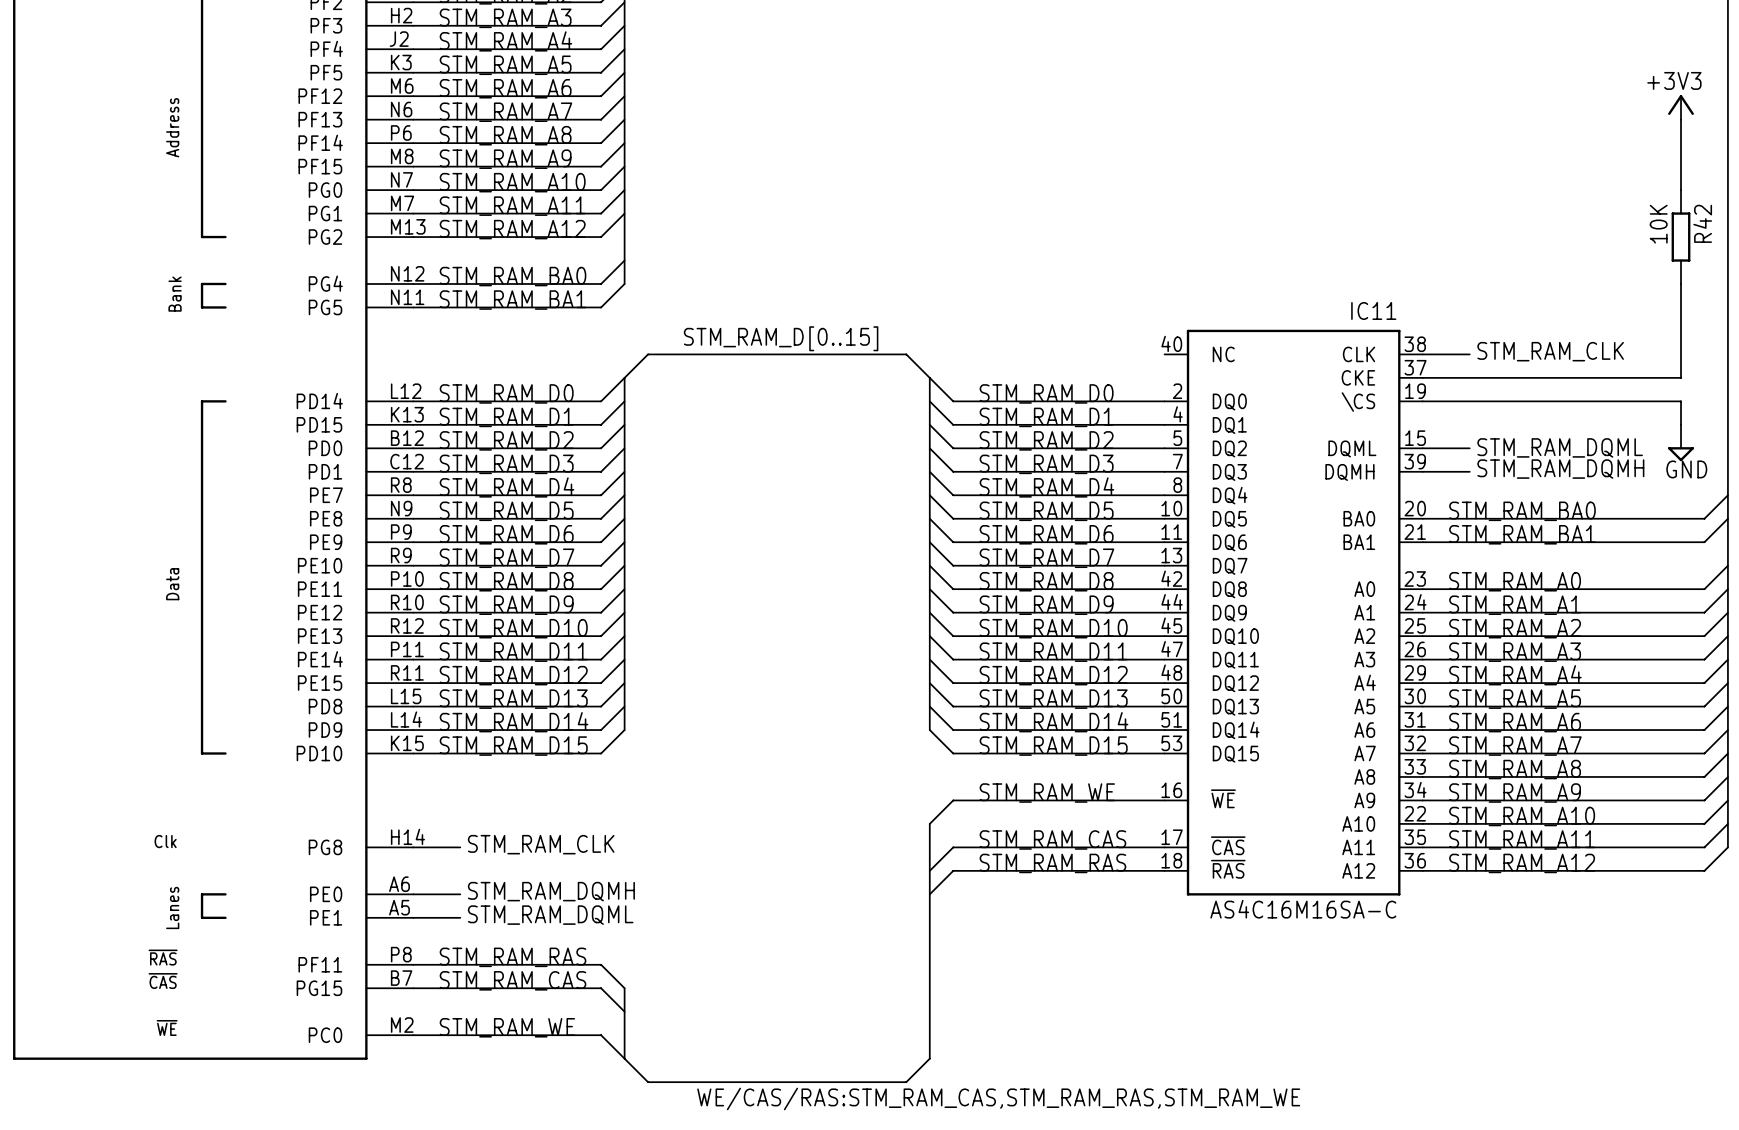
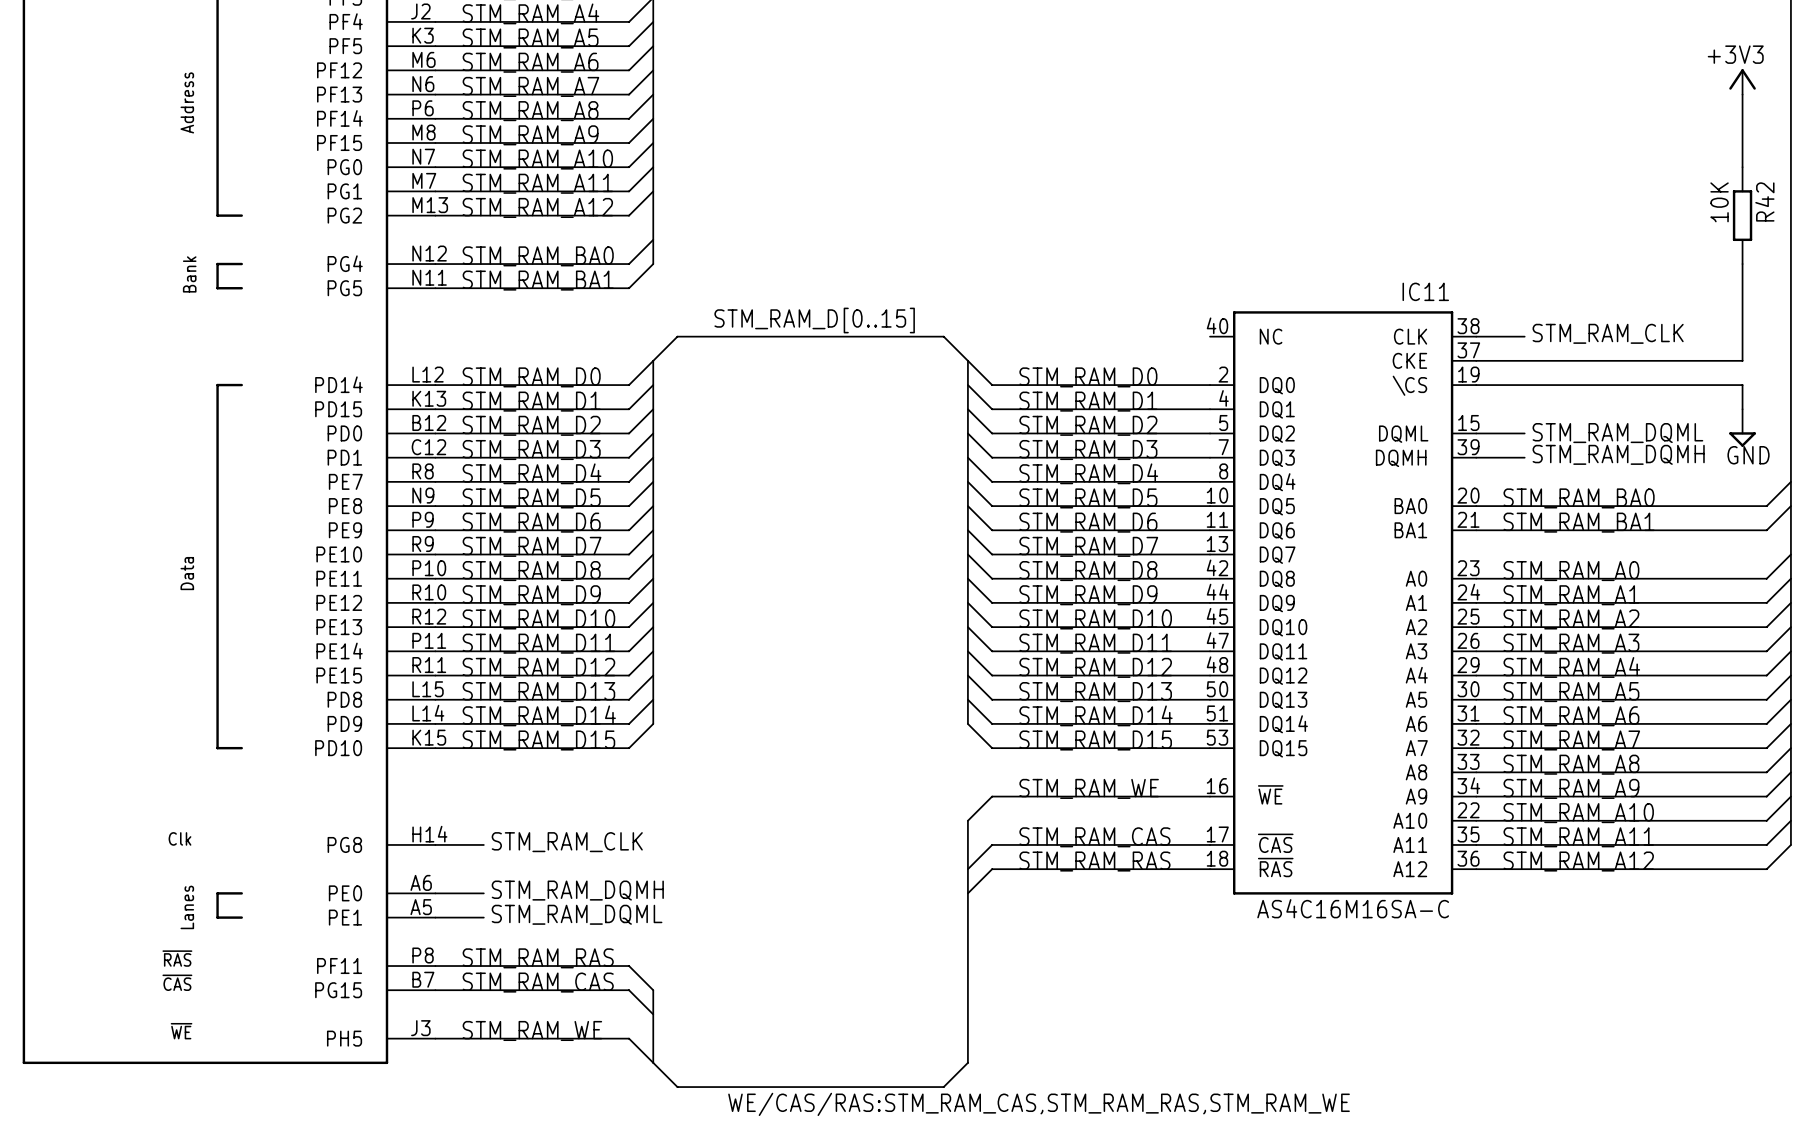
part pin number: M2 (402, 1025) -> J3 (420, 1028)
part pin name: PC0 (325, 1035) -> PH5 (344, 1038)

